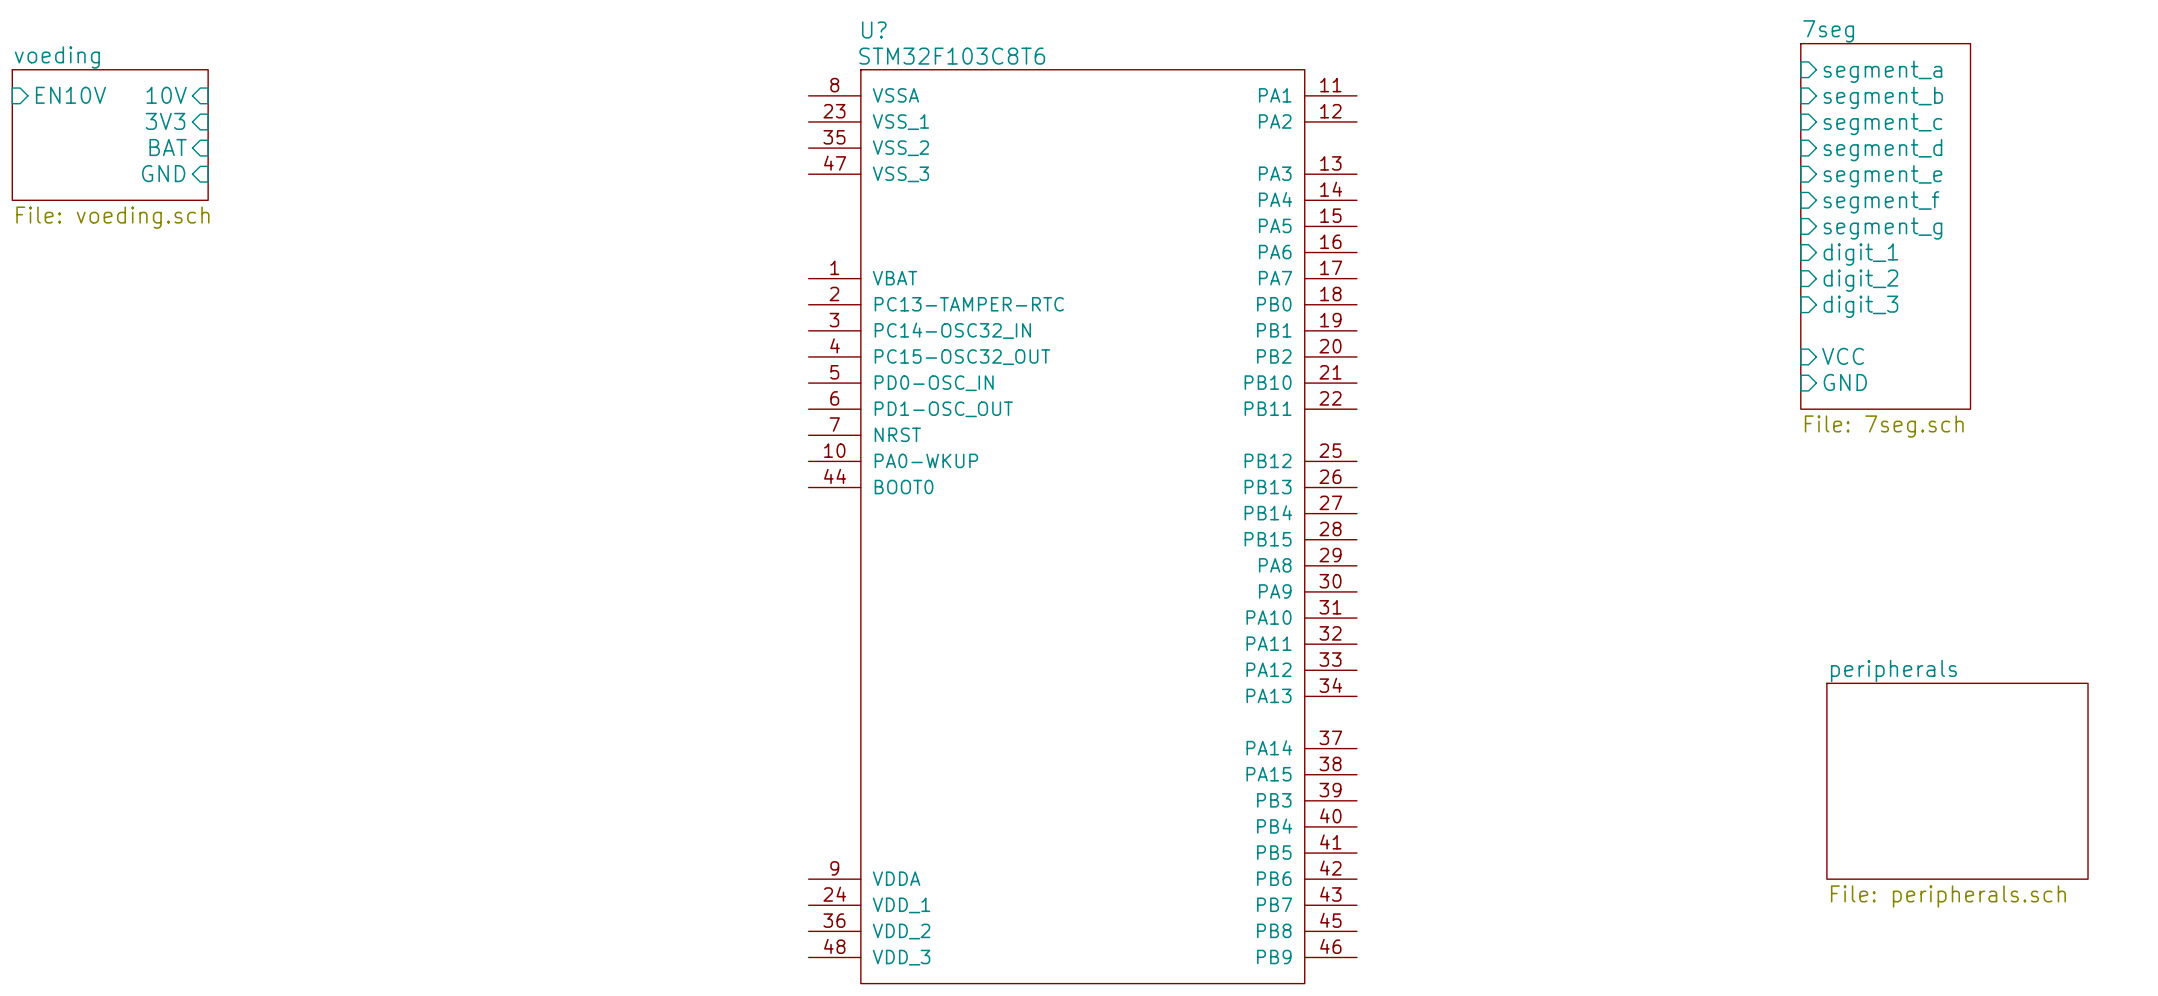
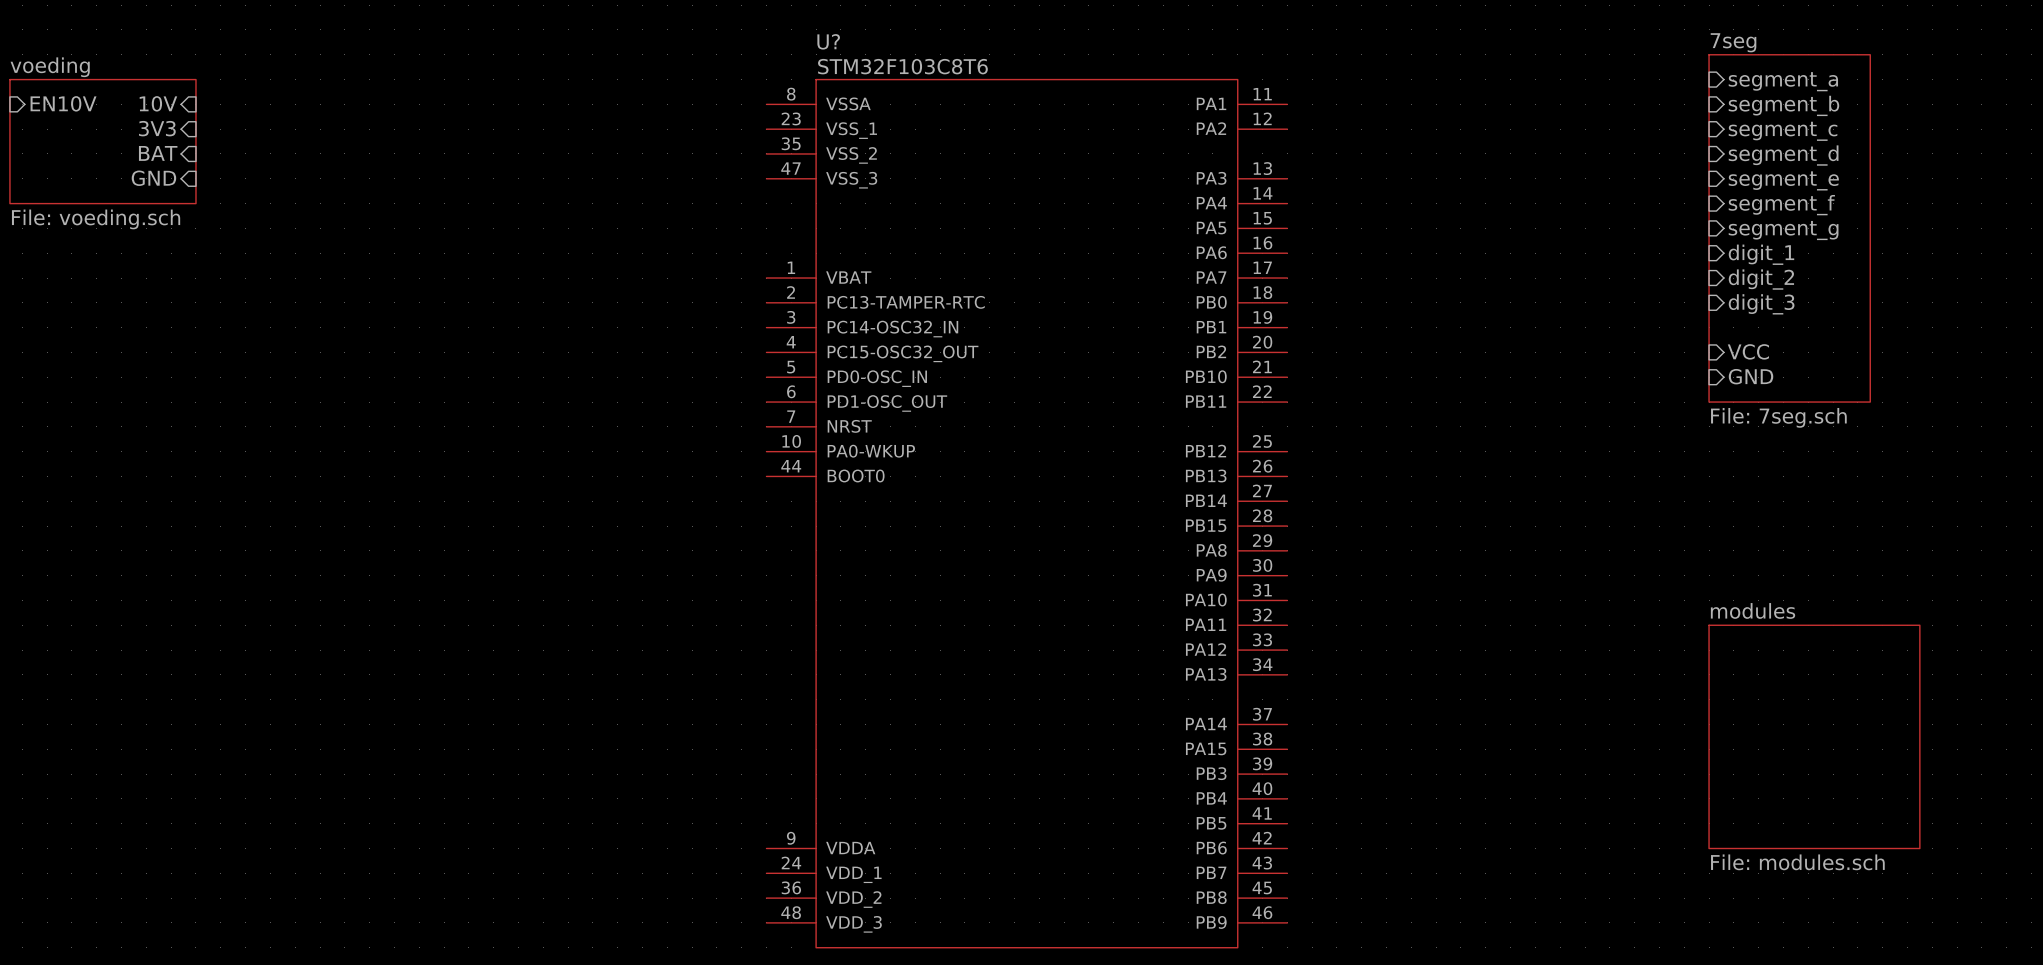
sheet modules: none -> File: modules.sch (1814, 736)
sheet peripherals: File: peripherals.sch (1957, 781) -> none

